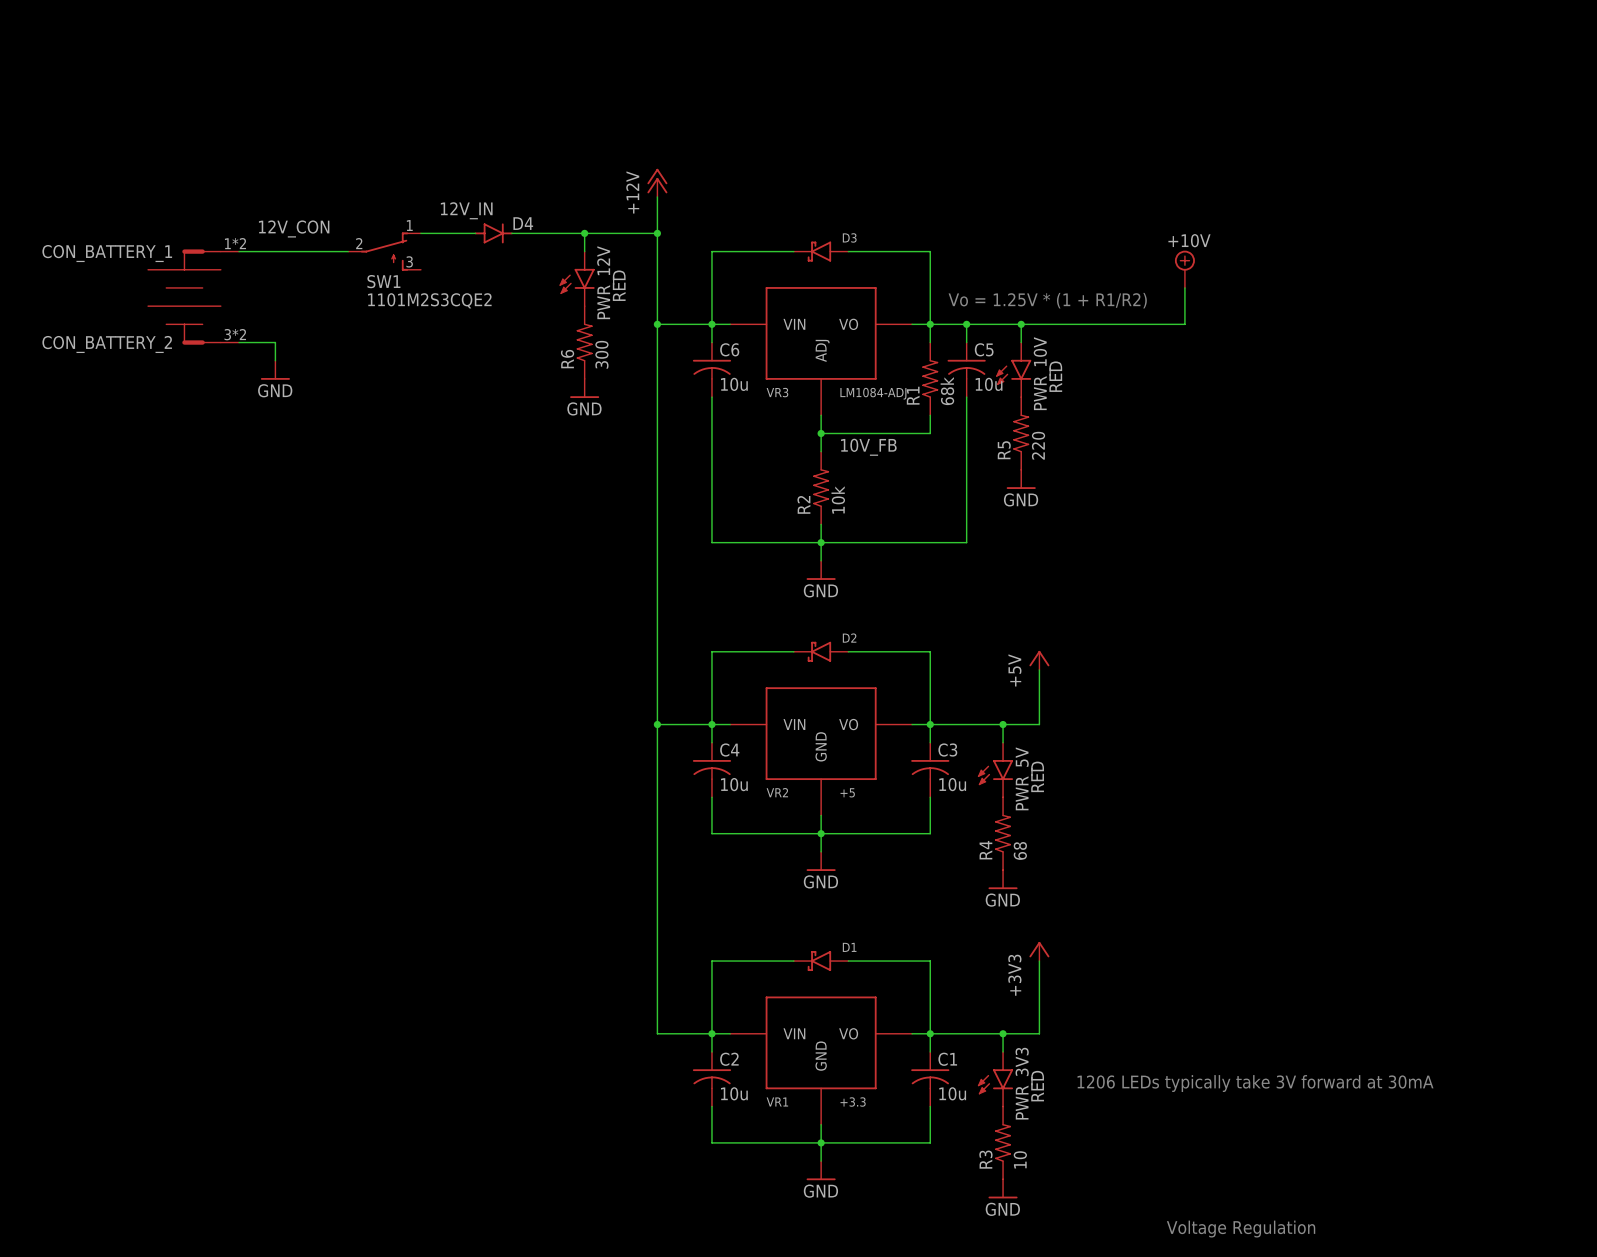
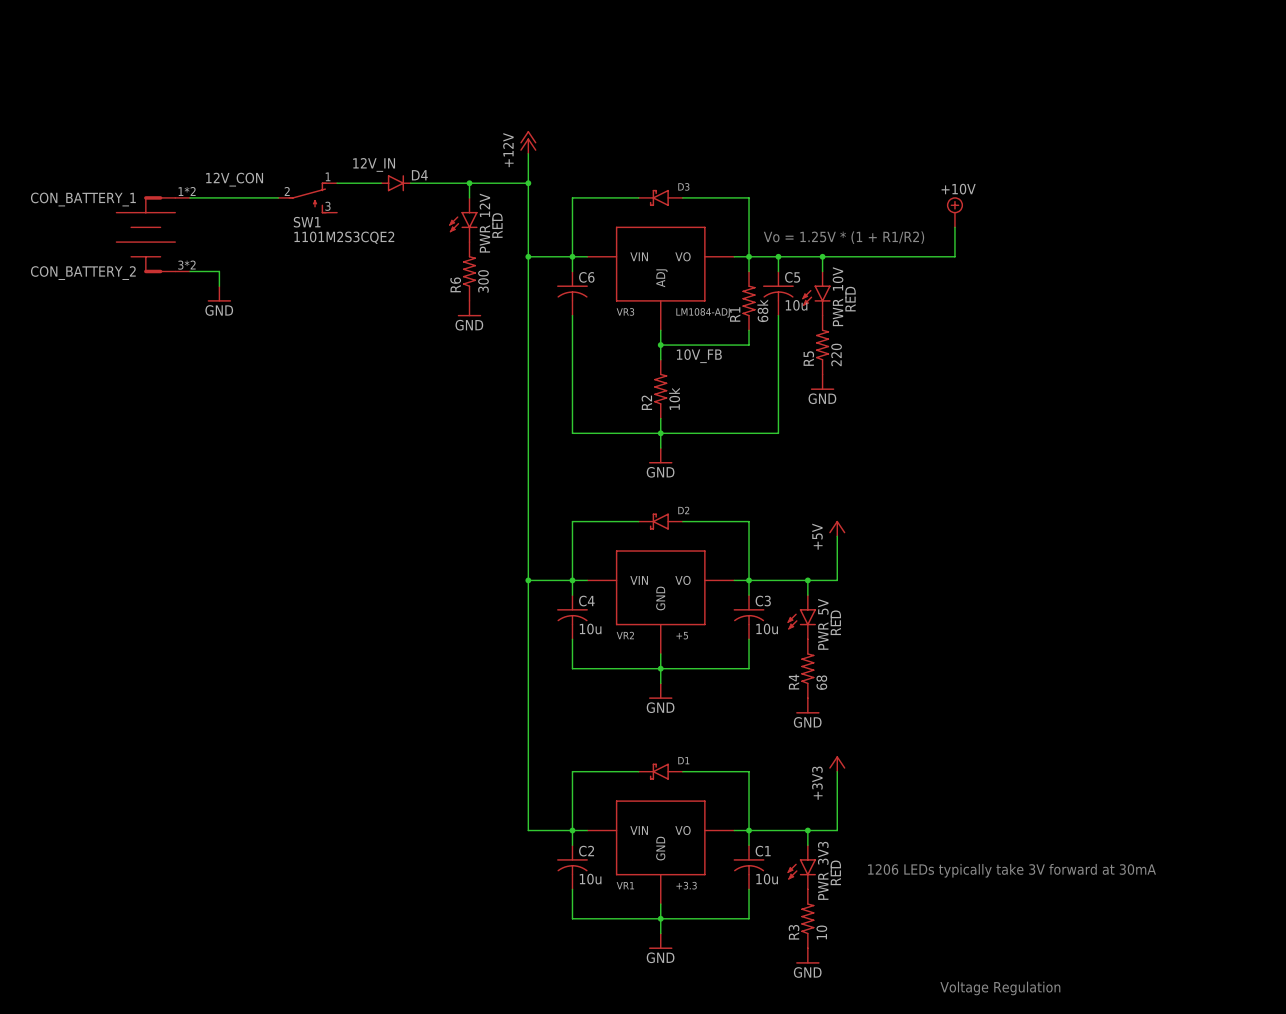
C6 value: 10u (734, 384) -> none

